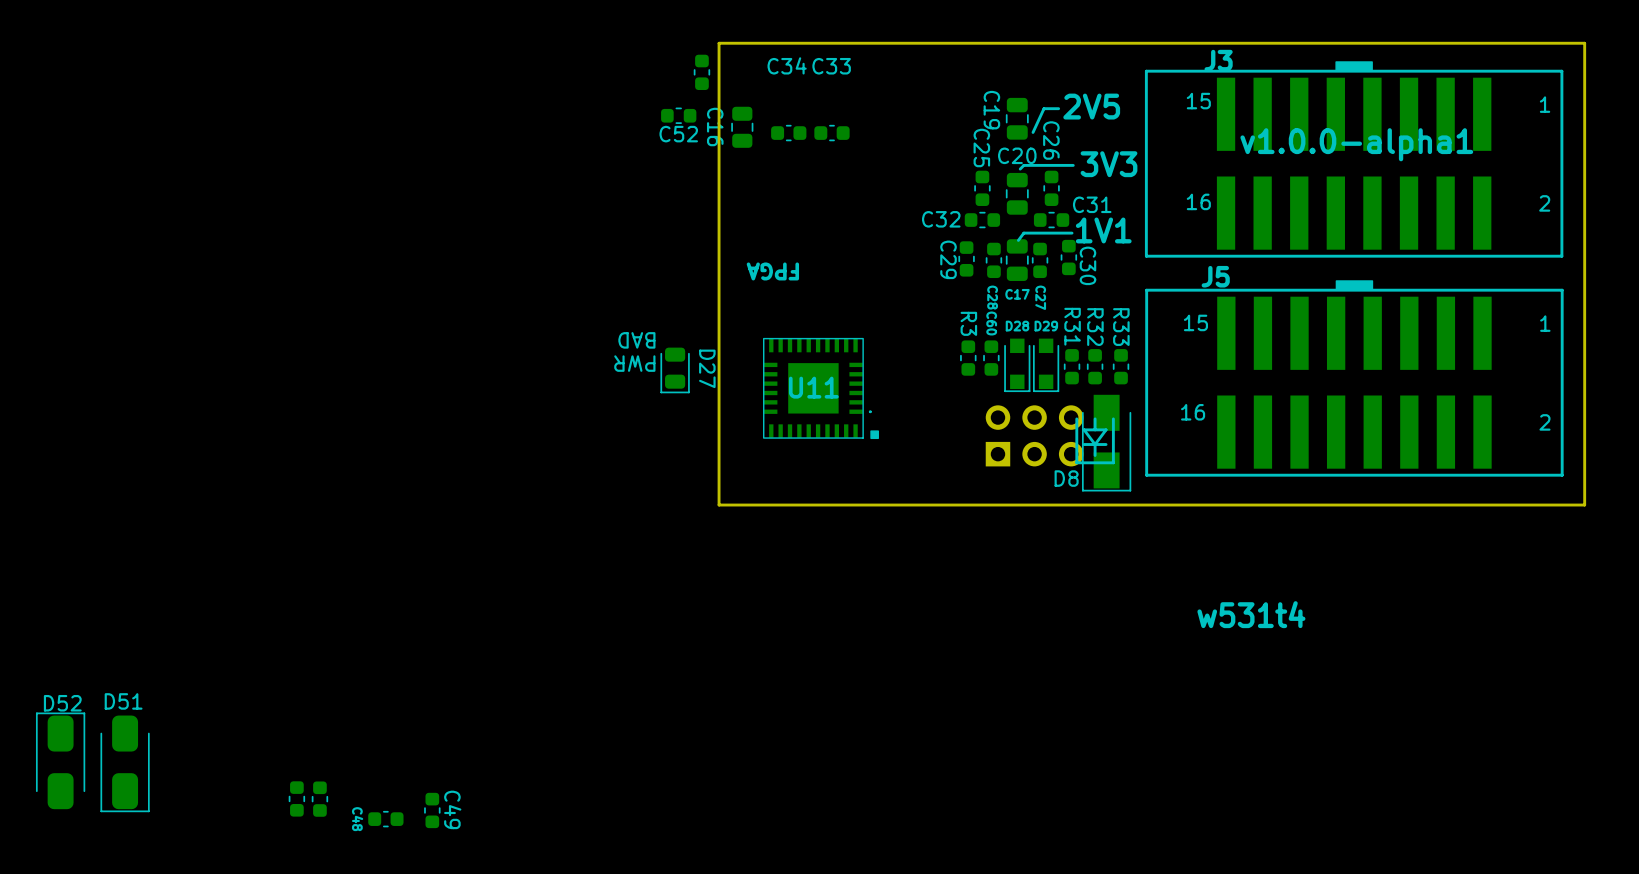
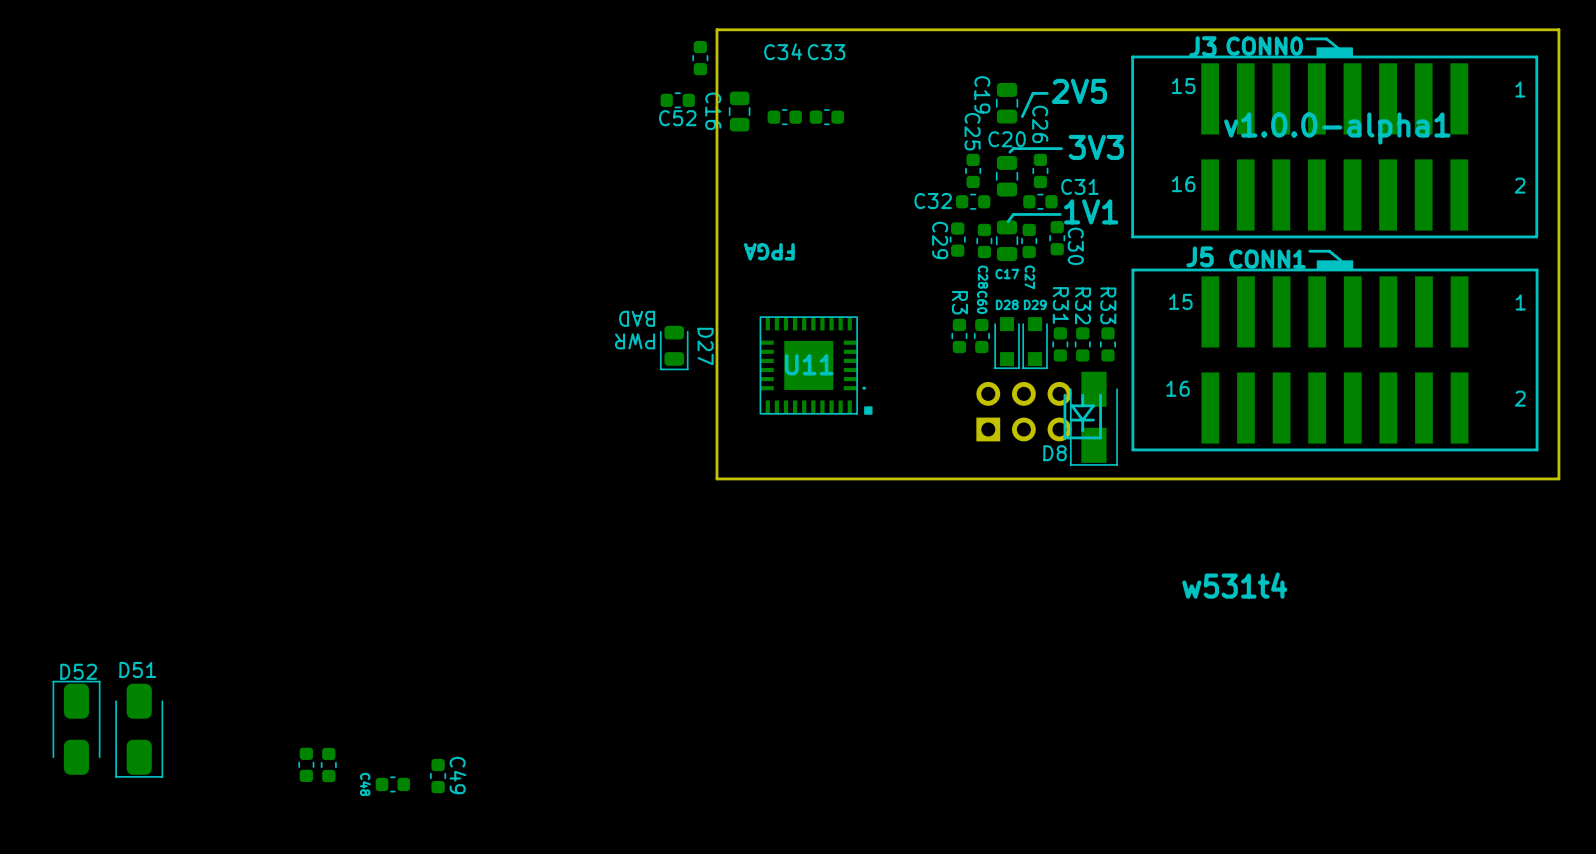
line: none -> (1306, 38) (1326, 38) (1337, 48)
text: none -> CONN0 (1264, 46)
line: none -> (1309, 251) (1329, 251) (1340, 260)
text: none -> CONN1 (1267, 259)

